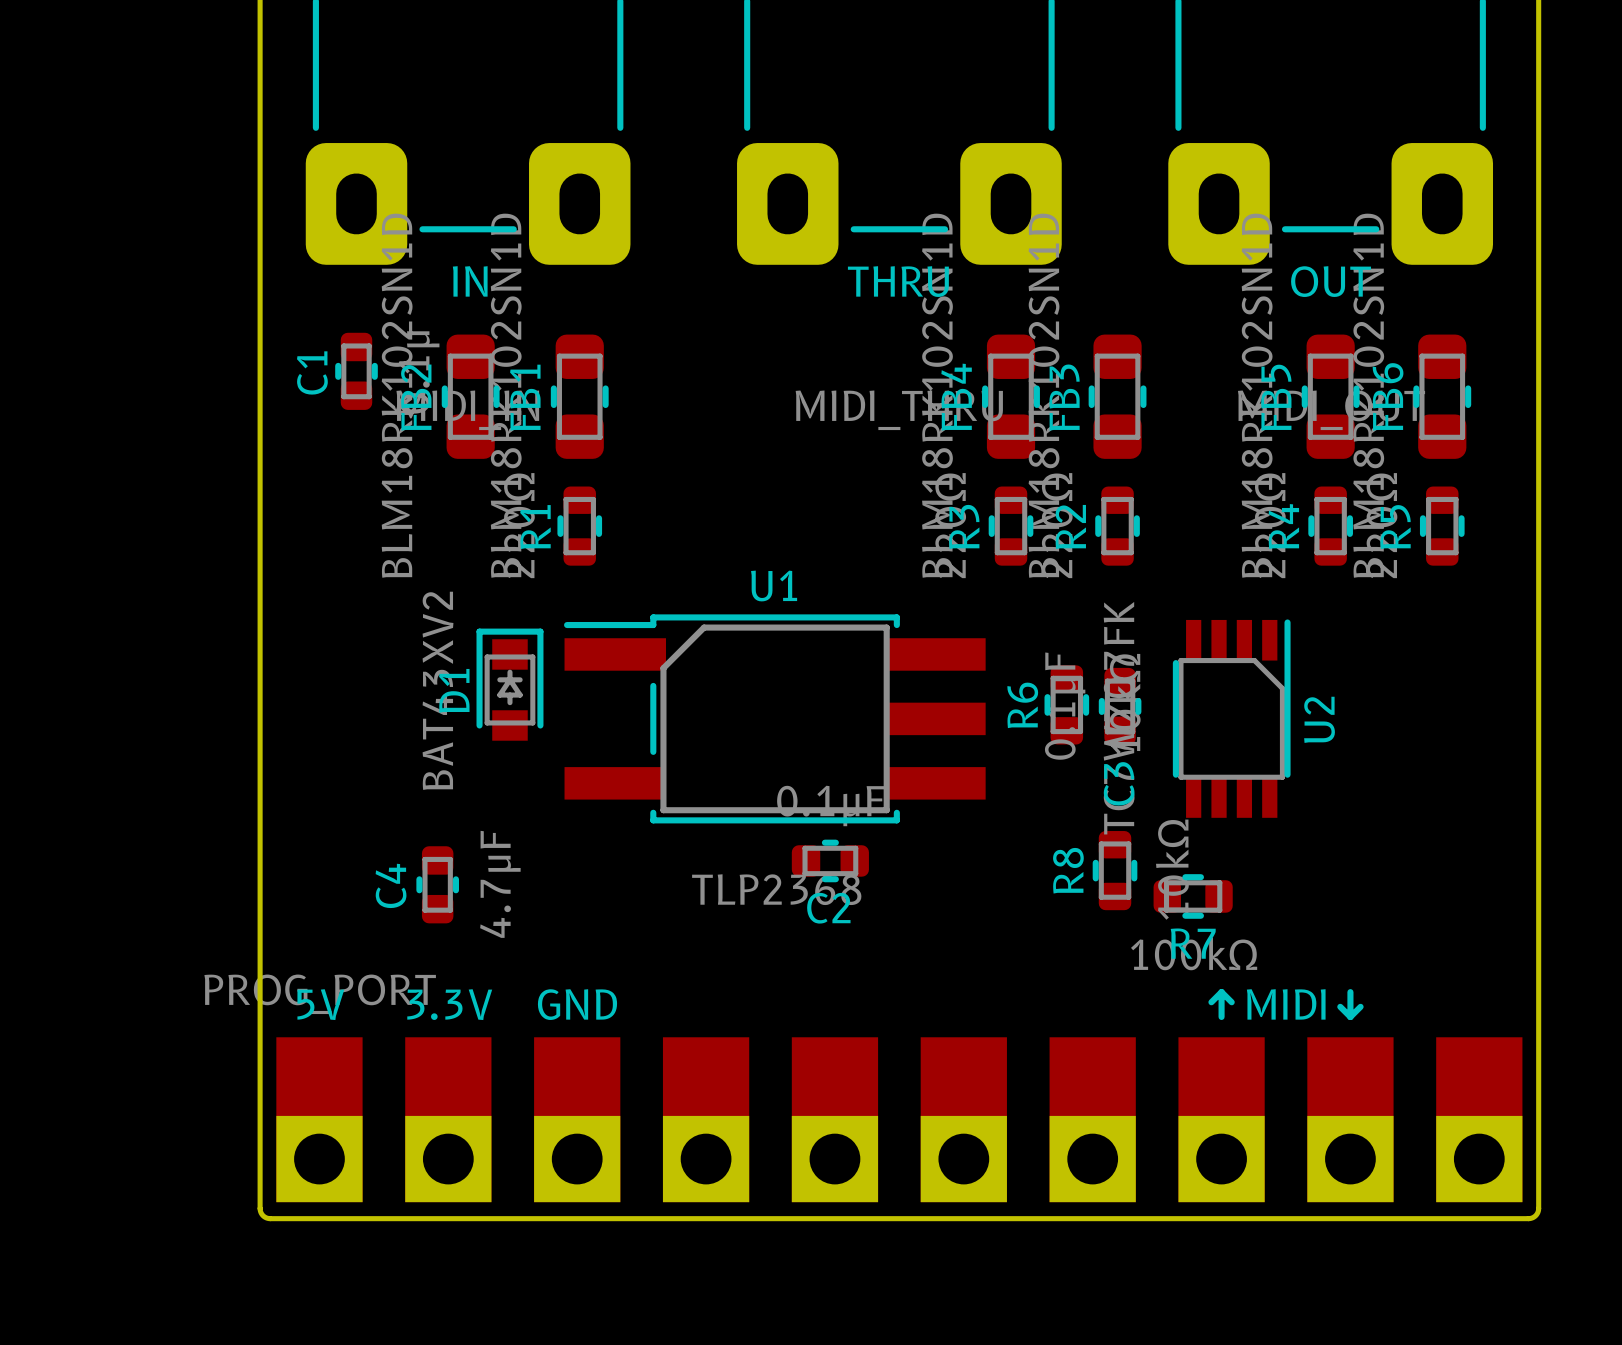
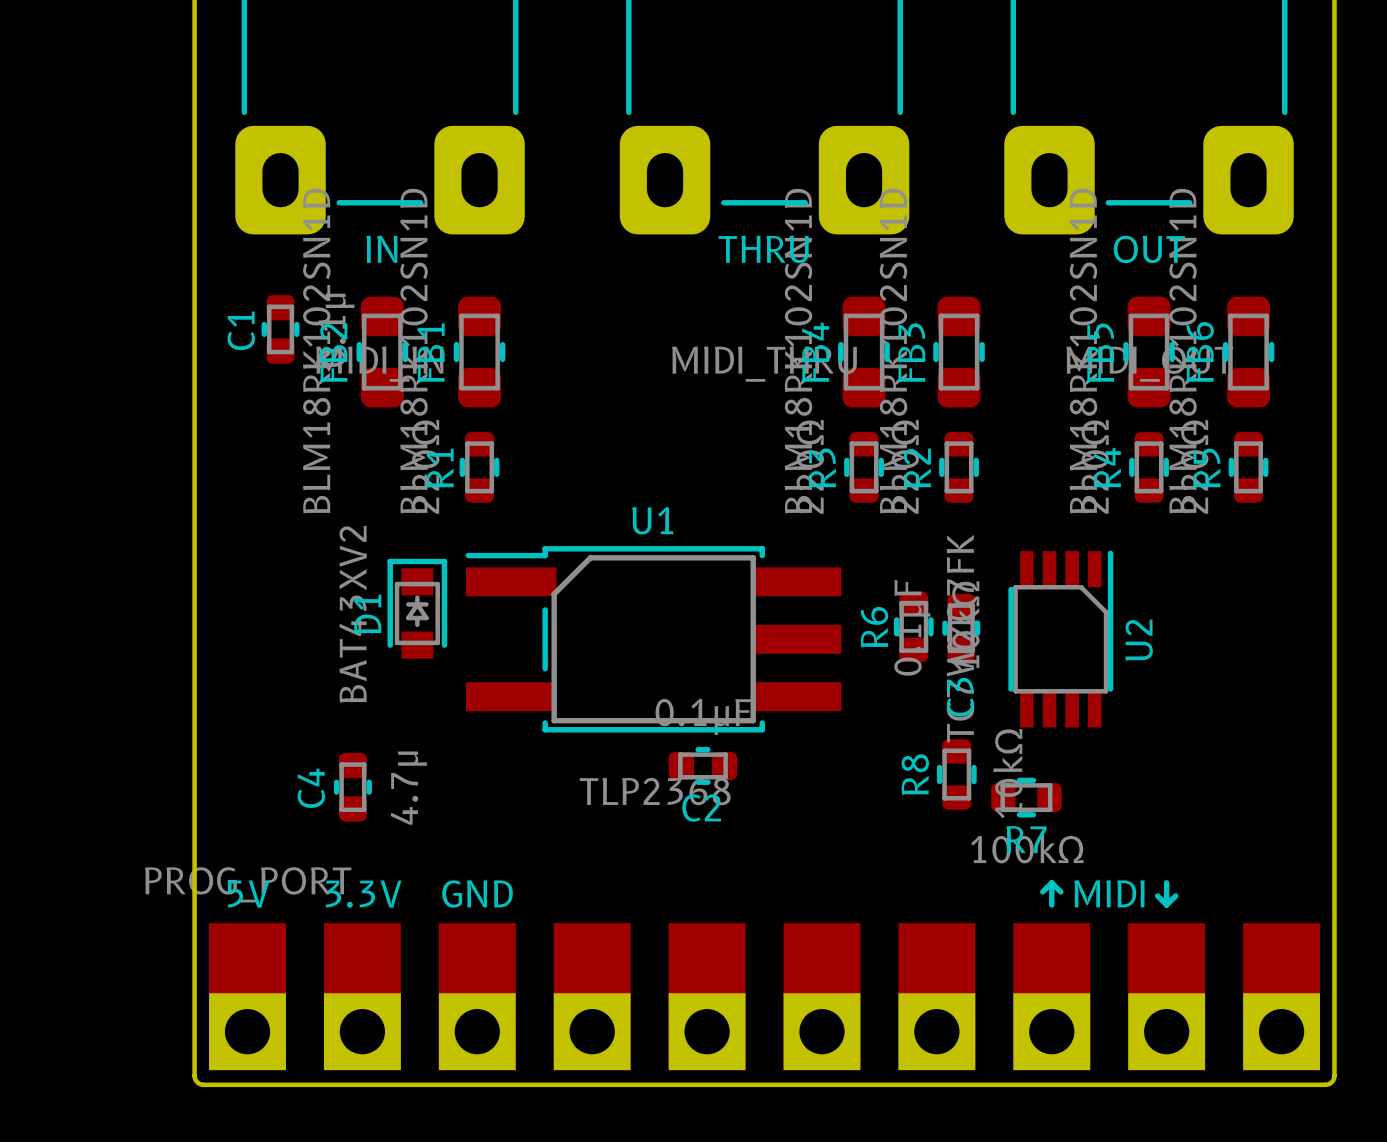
C4 value: 4.7μF (500, 884) -> 4.7μ (408, 788)

